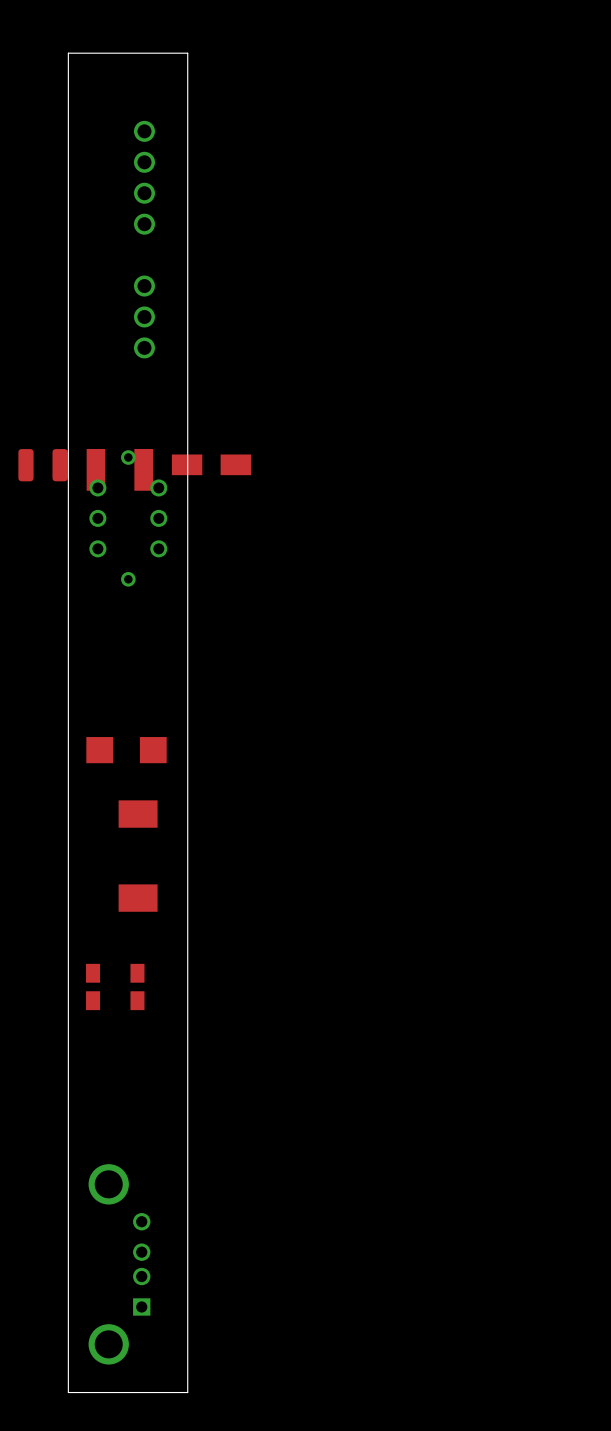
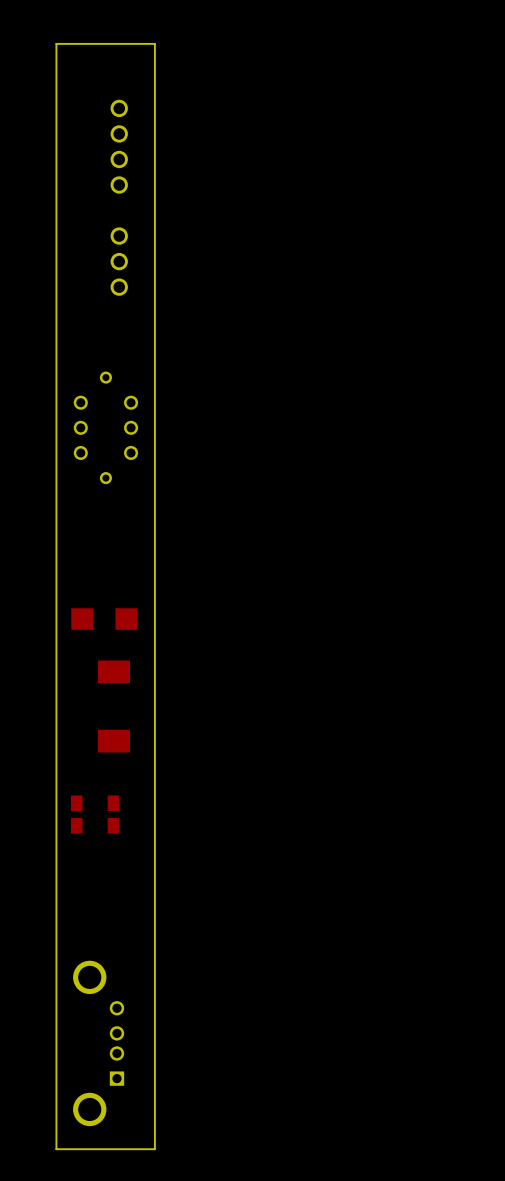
part: (211, 464) -> none
part: (43, 465) -> none
part: (119, 469) -> none

